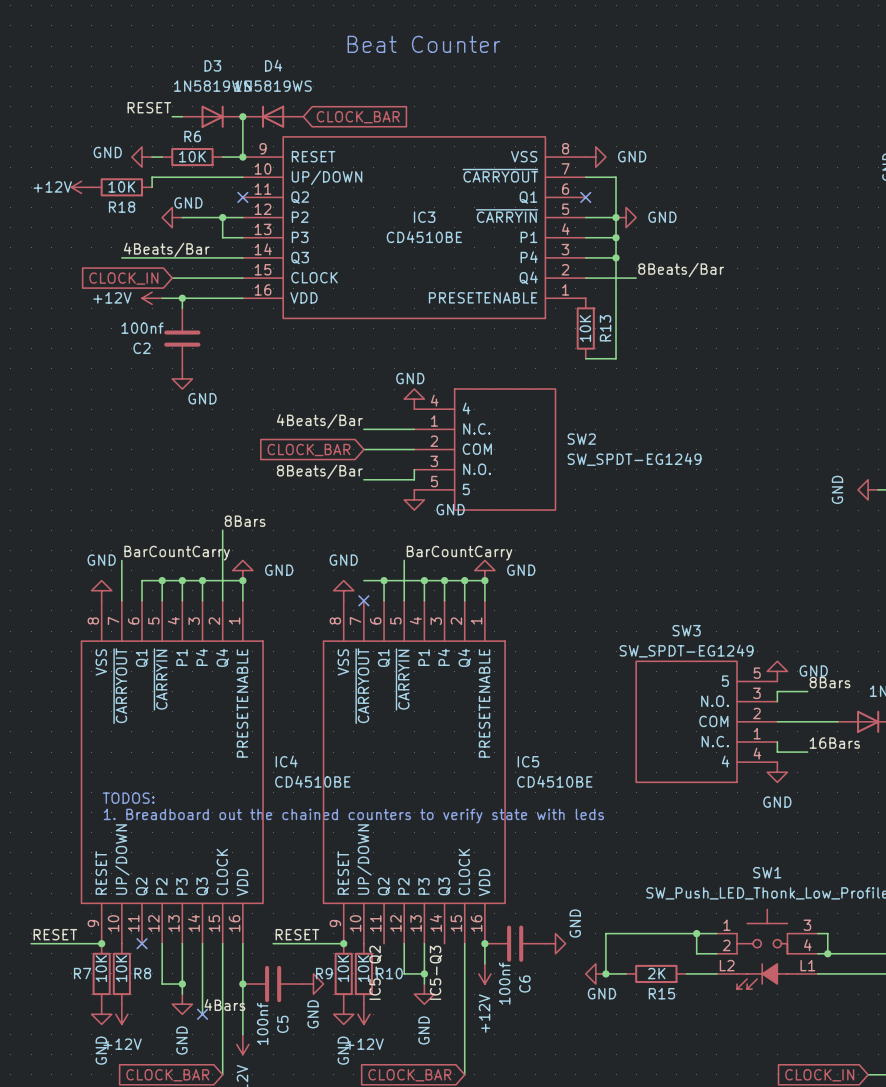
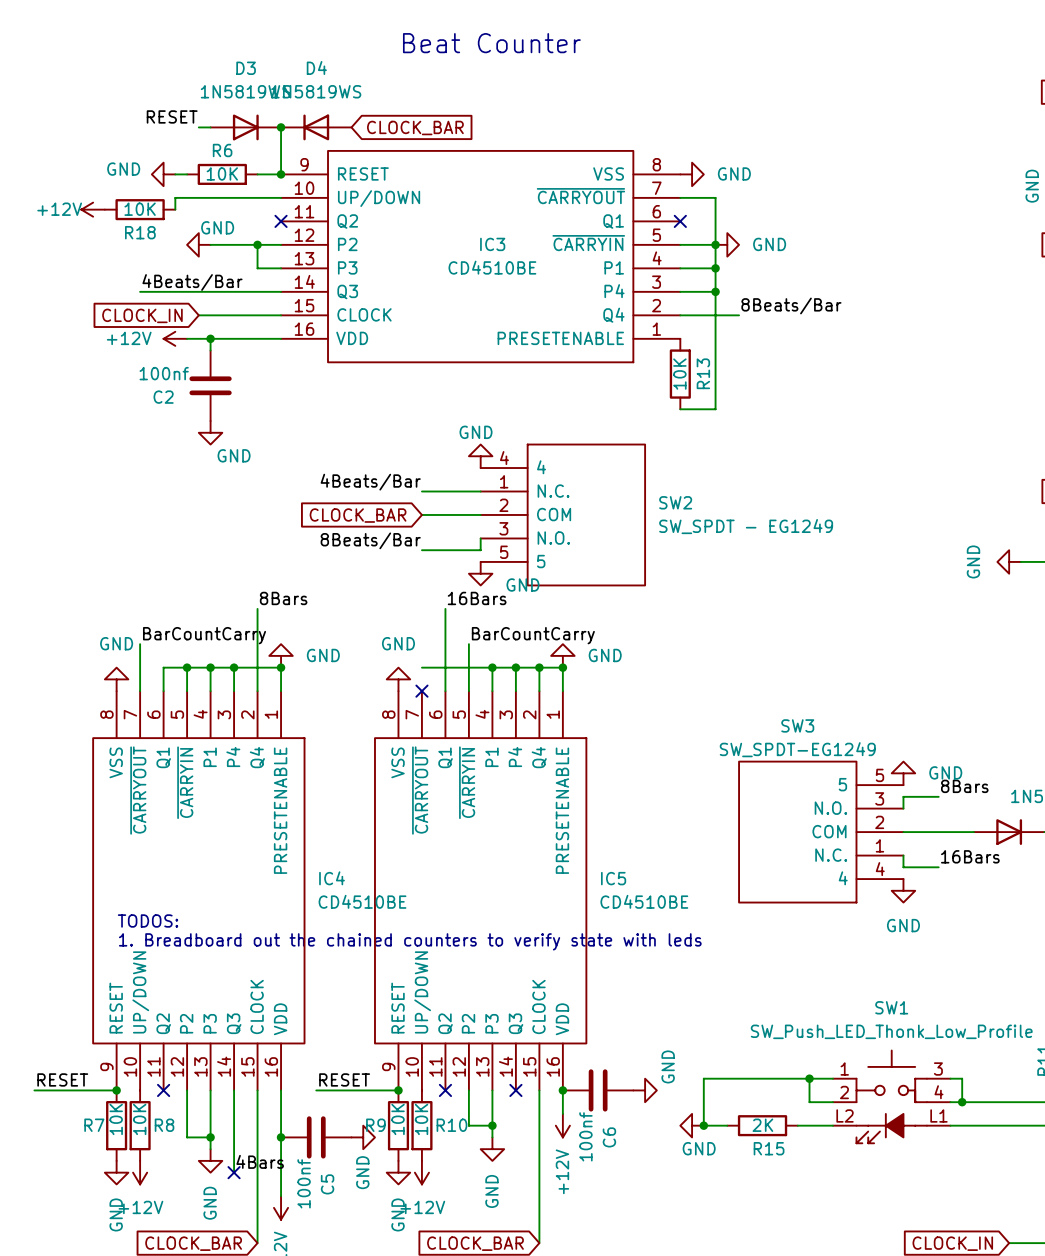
SW2 value: SW_SPDT-EG1249 (634, 459) -> SW_SPDT - EG1249 (746, 526)
label: none -> 16Bars (477, 598)
wire: none -> (445, 608) (445, 667)
junction: (384, 580) -> none
no-connect mark: none -> (445, 1090)
no-connect mark: none -> (515, 1090)
label: IC5-Q2 (375, 972) -> none
label: IC5-Q3 (436, 972) -> none

